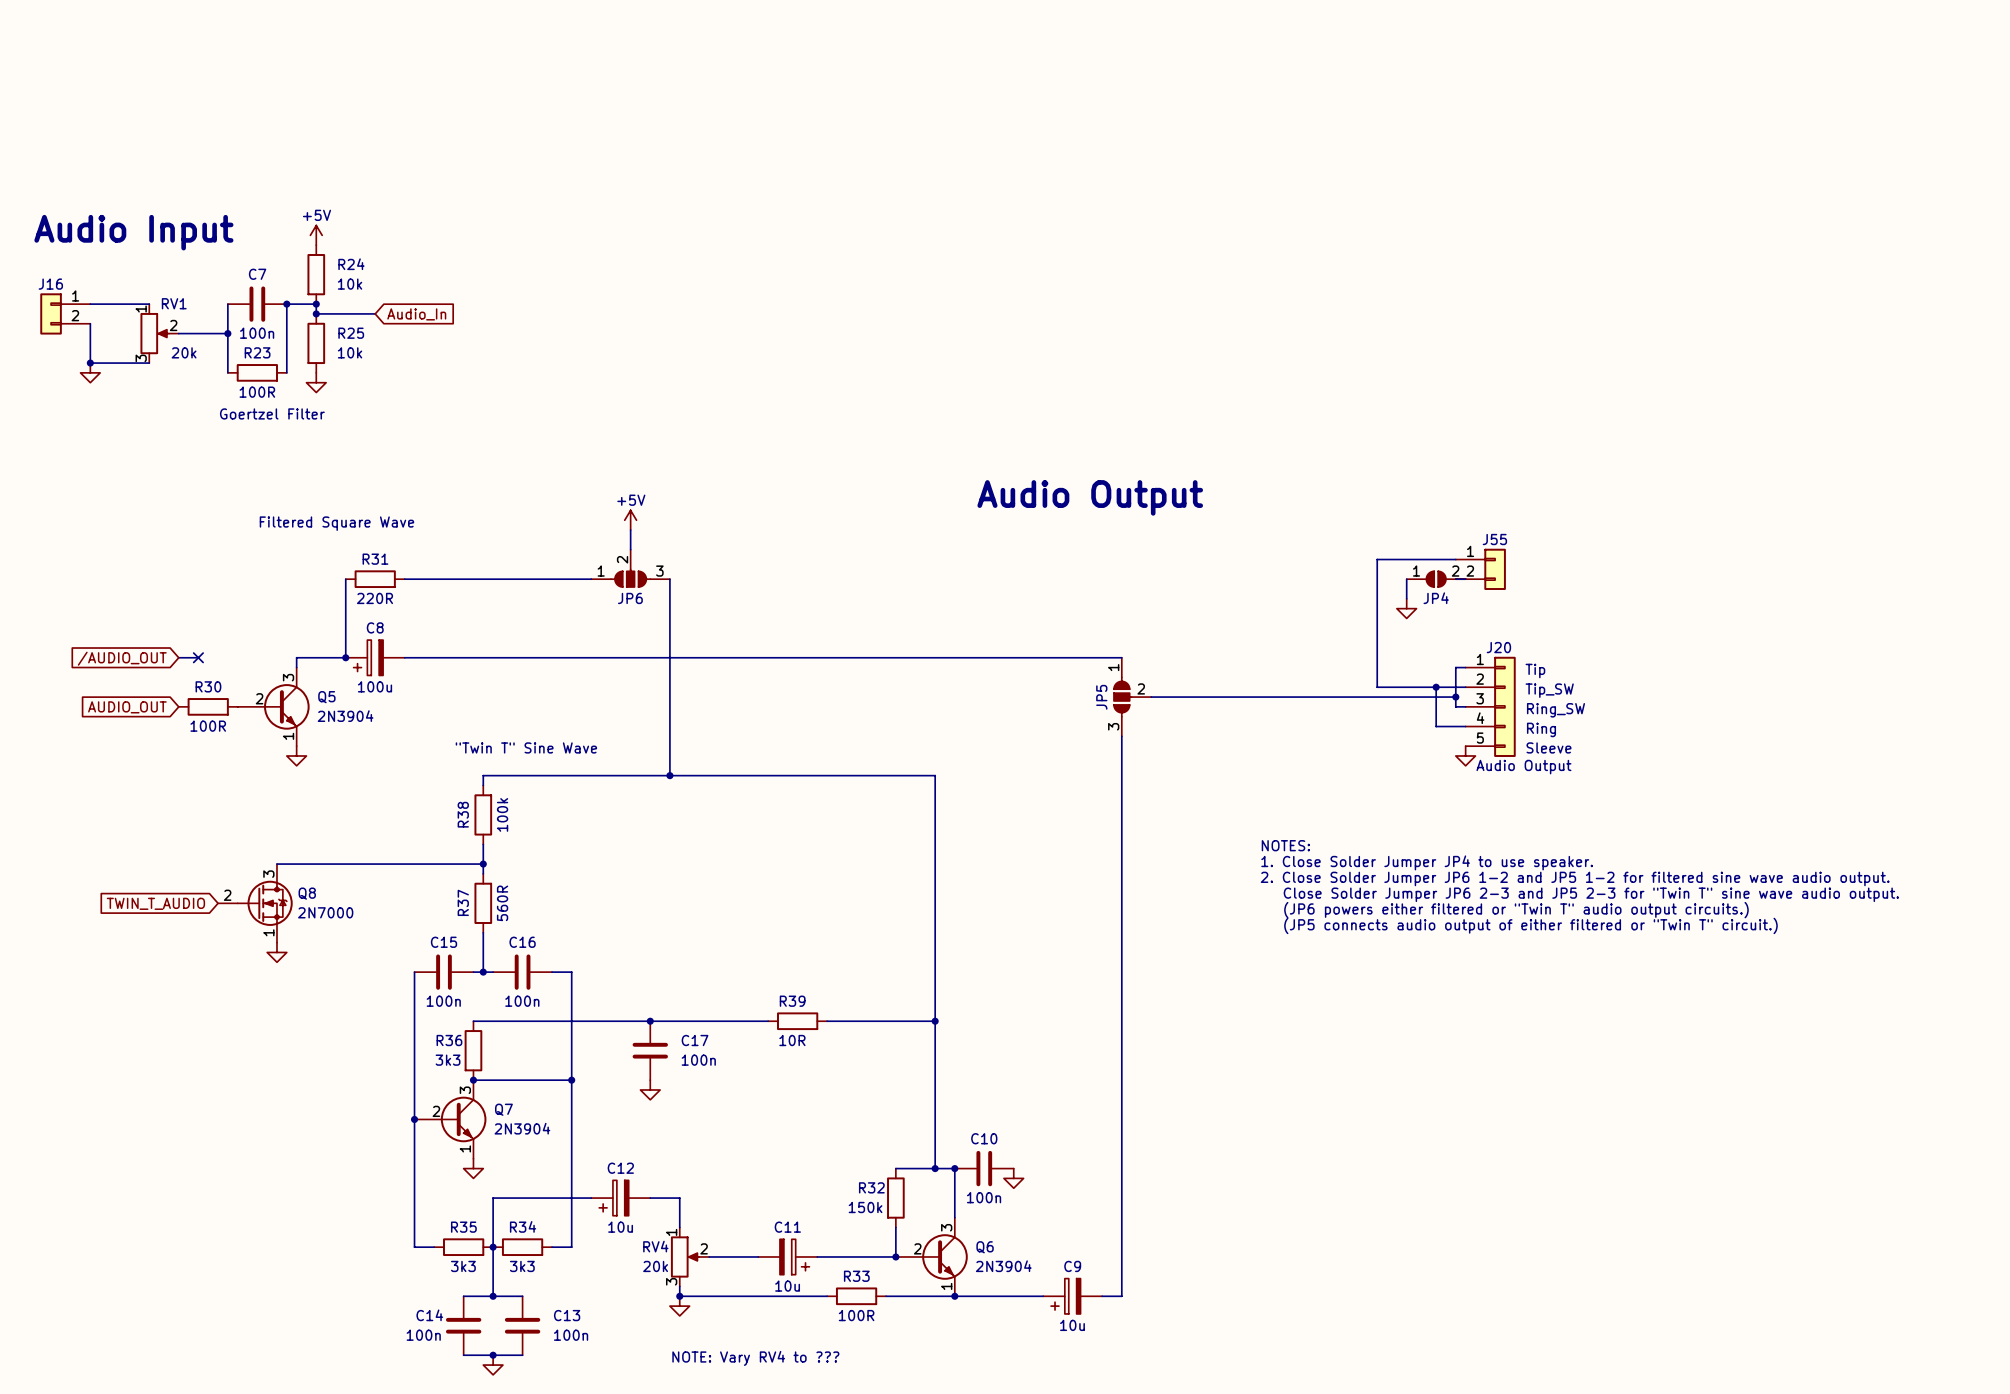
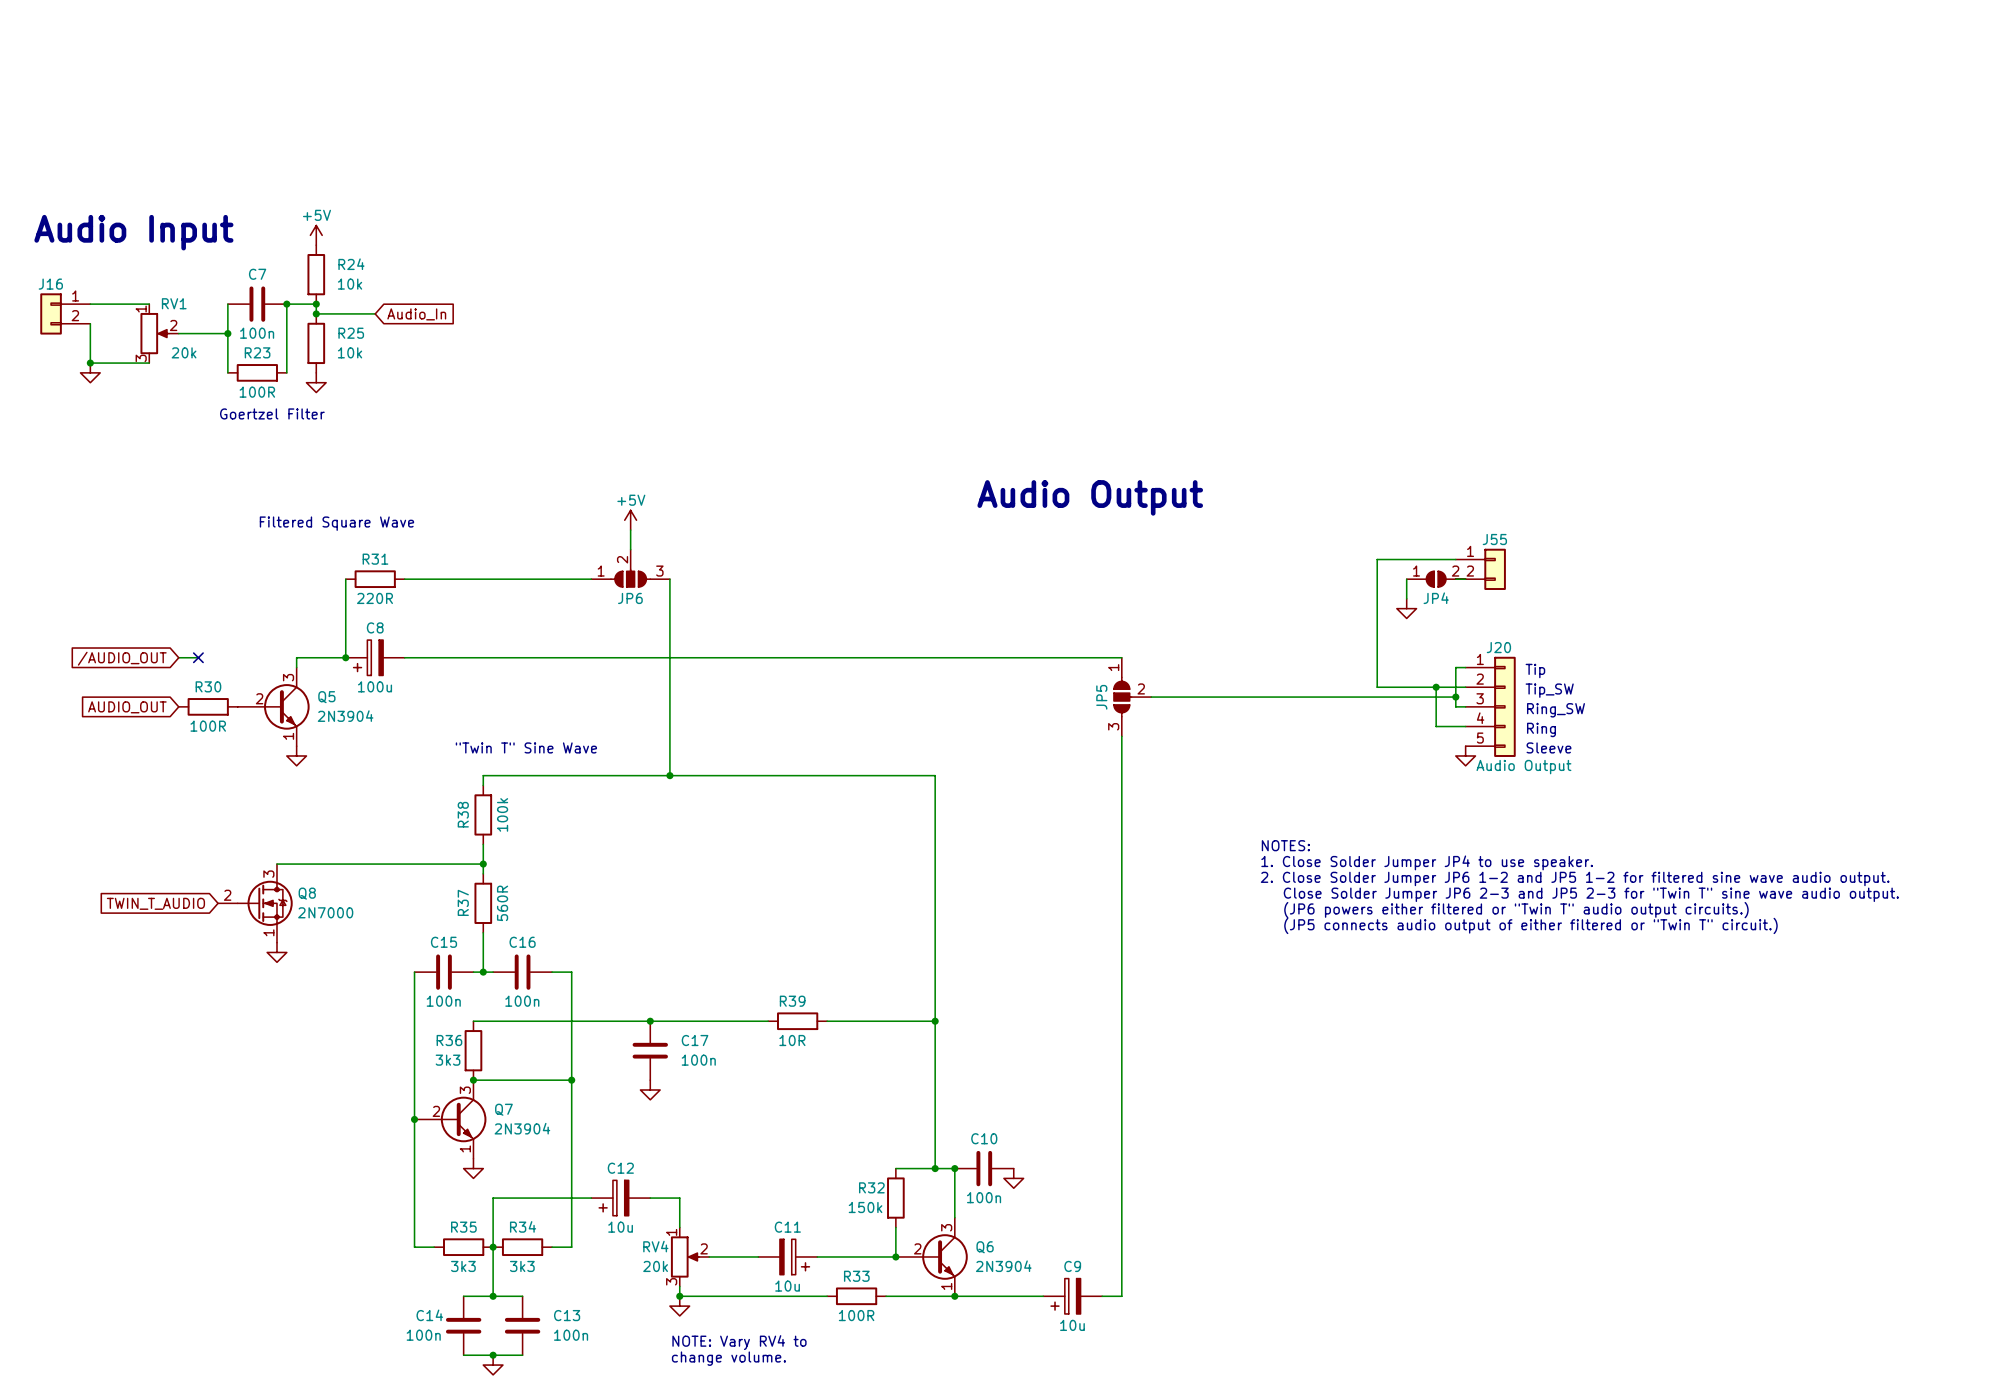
text: none -> NOTE: Vary RV4 to (739, 1342)
text: NOTE: Vary RV4 to ??? (755, 1358) -> change volume. (728, 1358)

